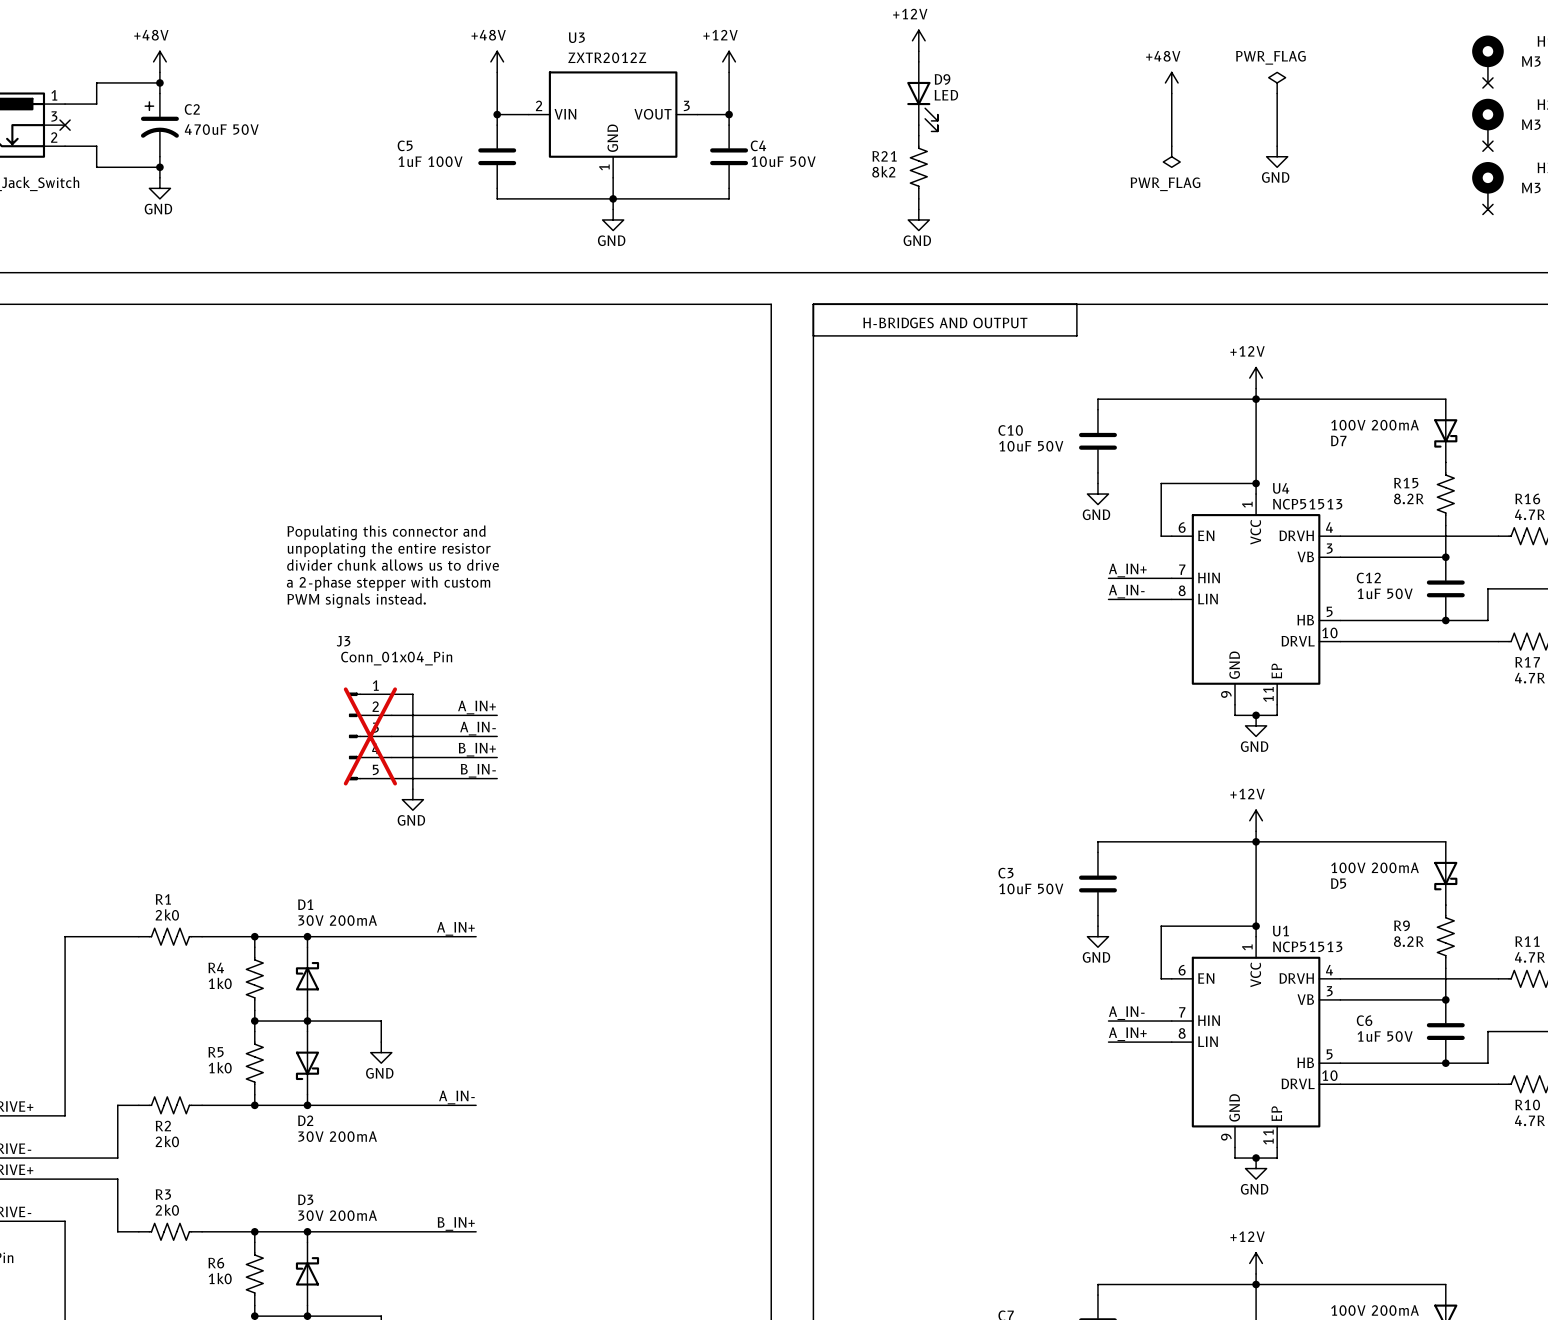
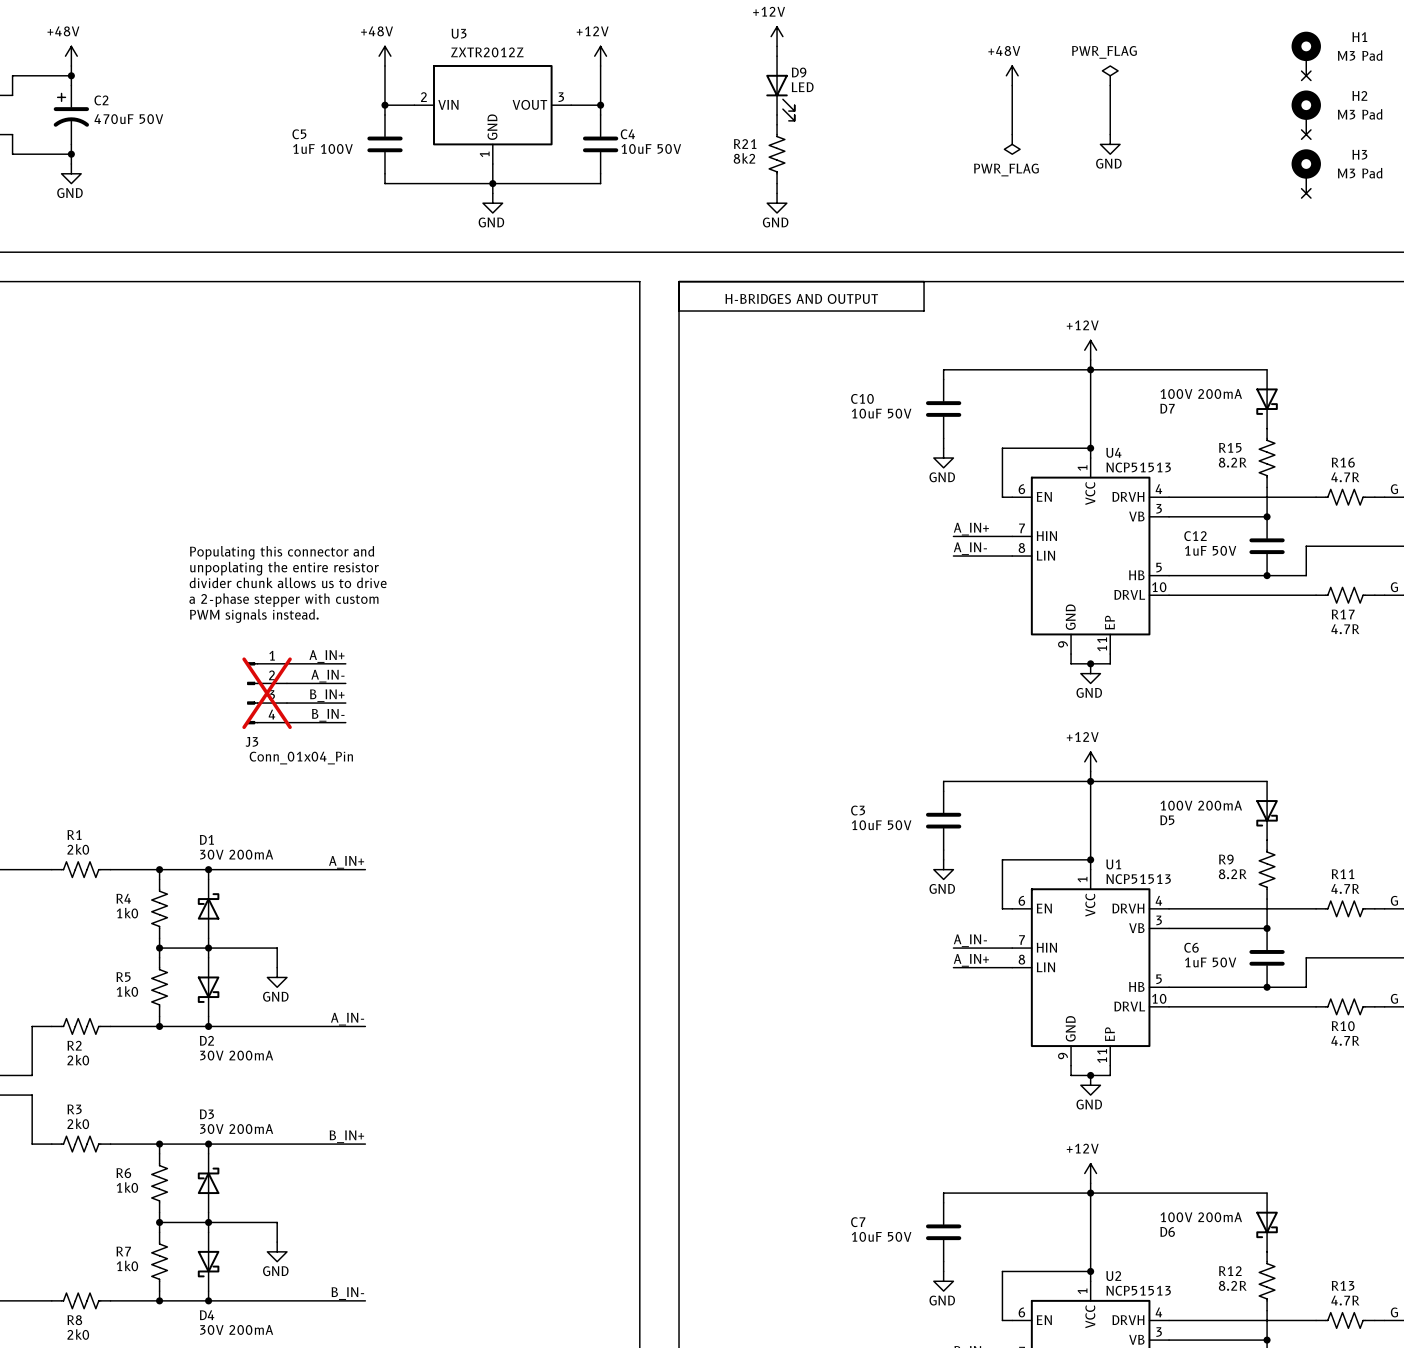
text position: Populating this connector and (386, 532) -> Populating this connector and (282, 552)
text position: unpoplating the entire resistor (389, 549) -> unpoplating the entire resistor (284, 568)
text position: divider chunk allows us to drive (393, 565) -> divider chunk allows us to drive (288, 582)
text position: a 2-phase stepper with custom (388, 583) -> a 2-phase stepper with custom (283, 600)
text position: PWM signals instead. (356, 600) -> PWM signals instead. (254, 616)
J3 name position: J3 (343, 641) -> J3 (251, 741)
J3 value position: Conn_01x04_Pin (396, 658) -> Conn_01x04_Pin (301, 758)
J3 symbol: [349, 692, 392, 781] -> [247, 662, 287, 725]
wire: (391, 694) (412, 694) (412, 789) -> none
label position: A_IN+ (476, 707) -> A_IN+ (326, 656)
wire: (455, 715) (497, 715) -> none
label position: A_IN- (478, 728) -> A_IN- (327, 676)
wire: (455, 736) (497, 736) -> none
label position: B_IN+ (477, 749) -> B_IN+ (327, 695)
wire: (455, 757) (497, 757) -> none
label position: B_IN- (478, 770) -> B_IN- (328, 715)
wire: (455, 778) (497, 778) -> none
power symbol: GND (412, 799) -> none

